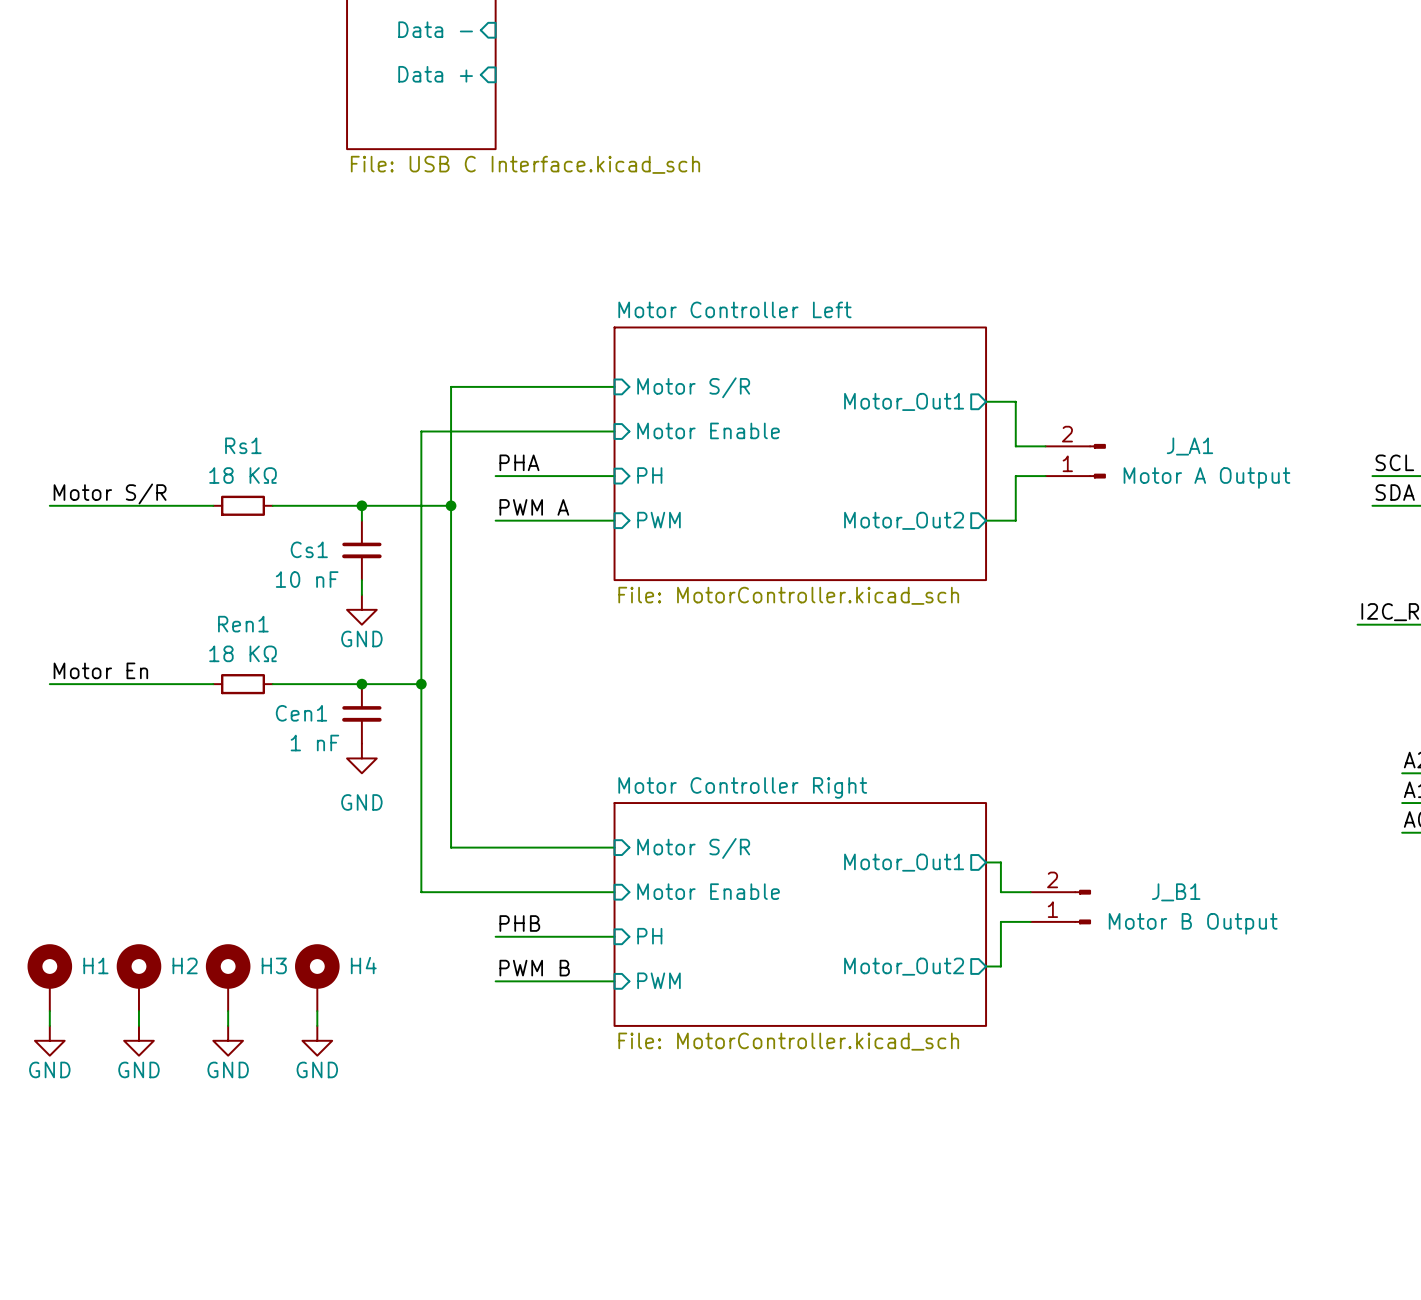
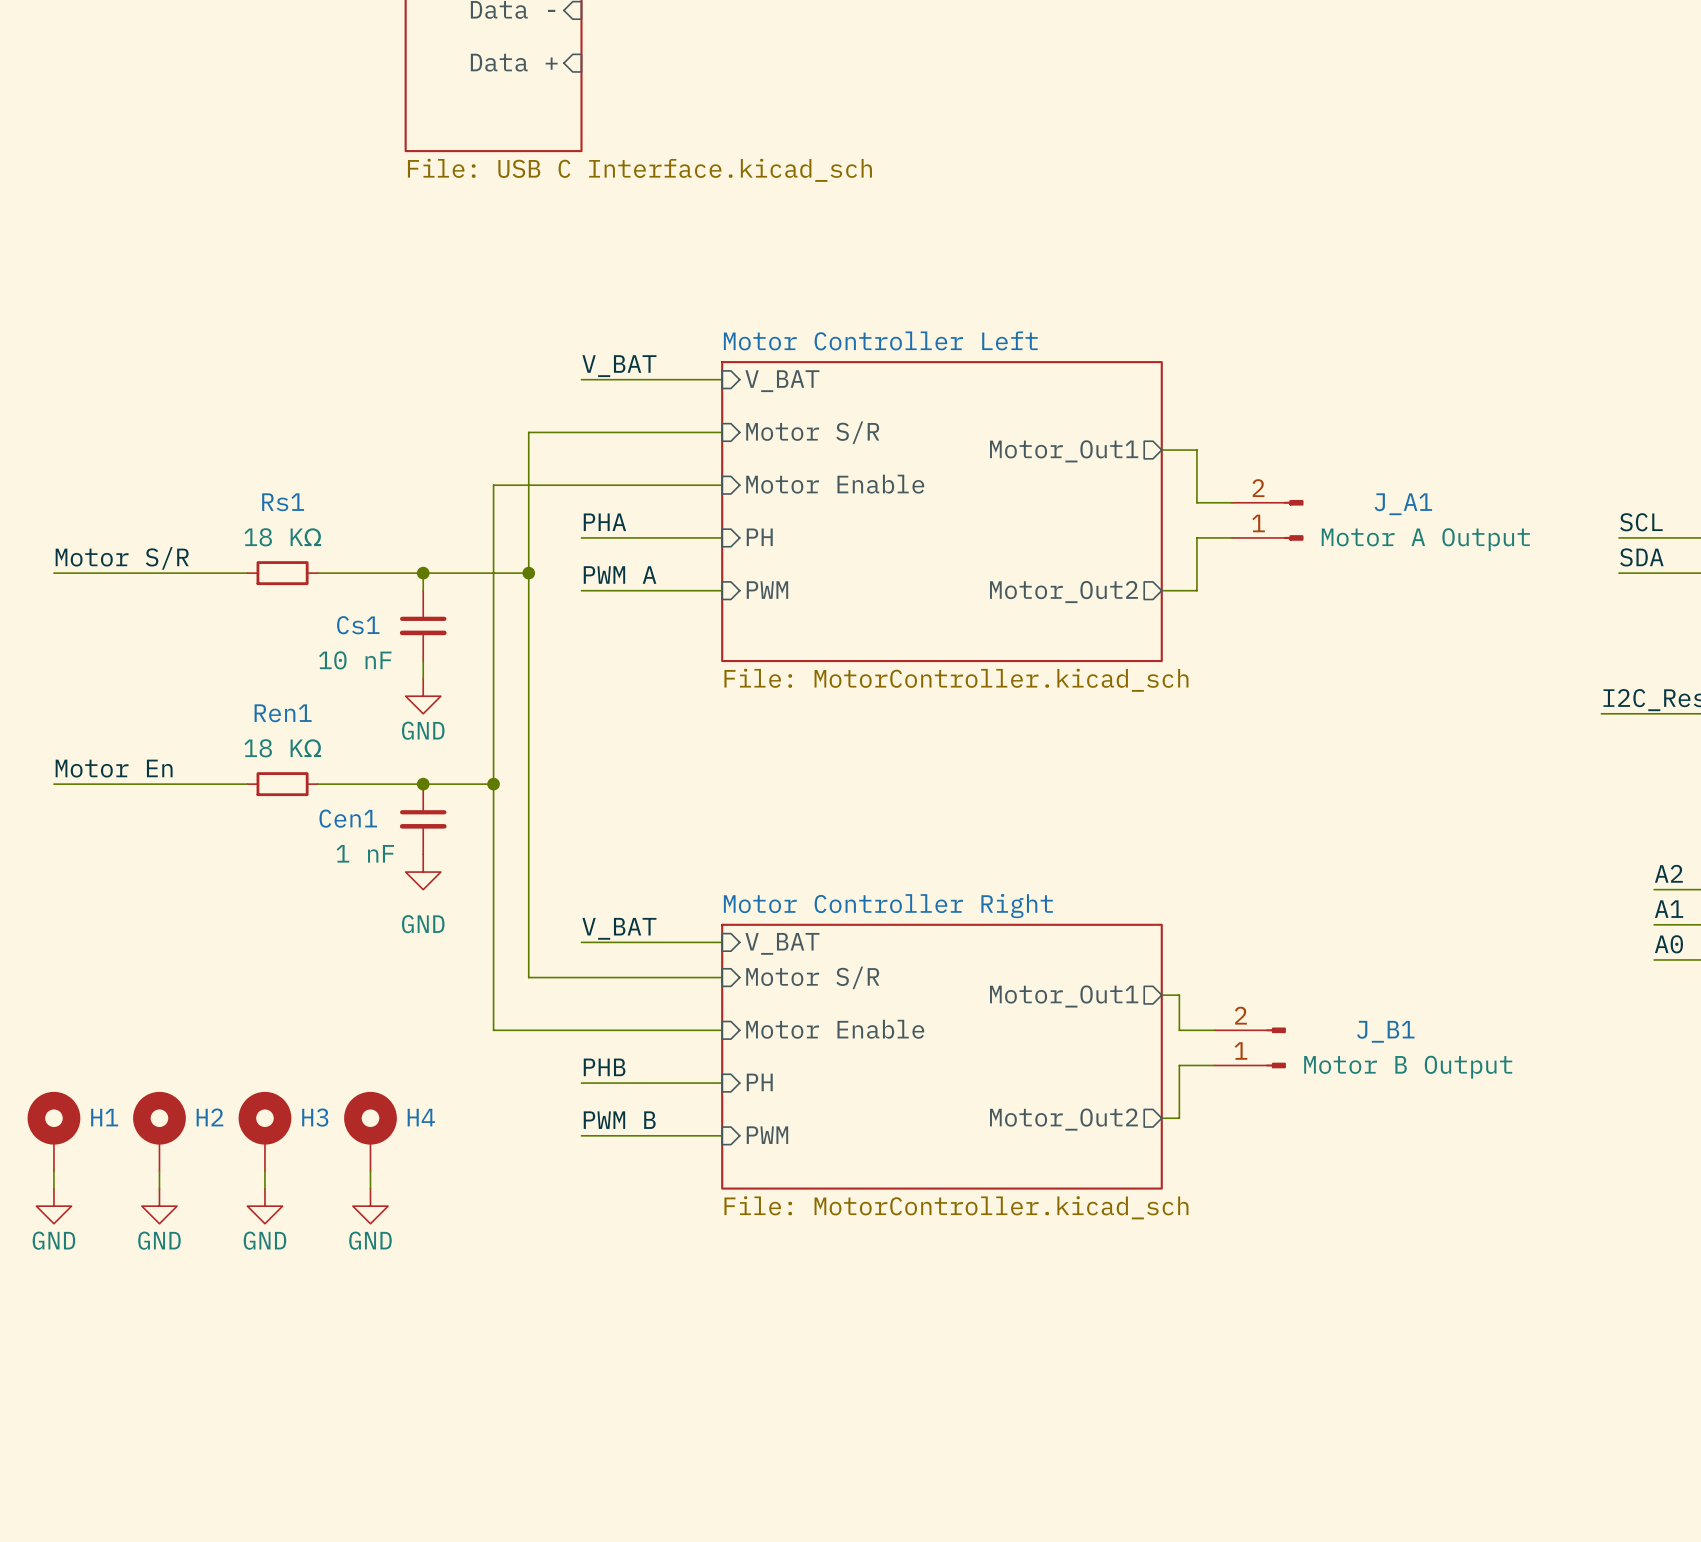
label: none -> V_BAT (619, 366)
wire: none -> (581, 379) (722, 379)
sheet pin: none -> V_BAT (782, 381)
label: none -> V_BAT (619, 928)
wire: none -> (581, 942) (722, 942)
sheet pin: none -> V_BAT (782, 943)

